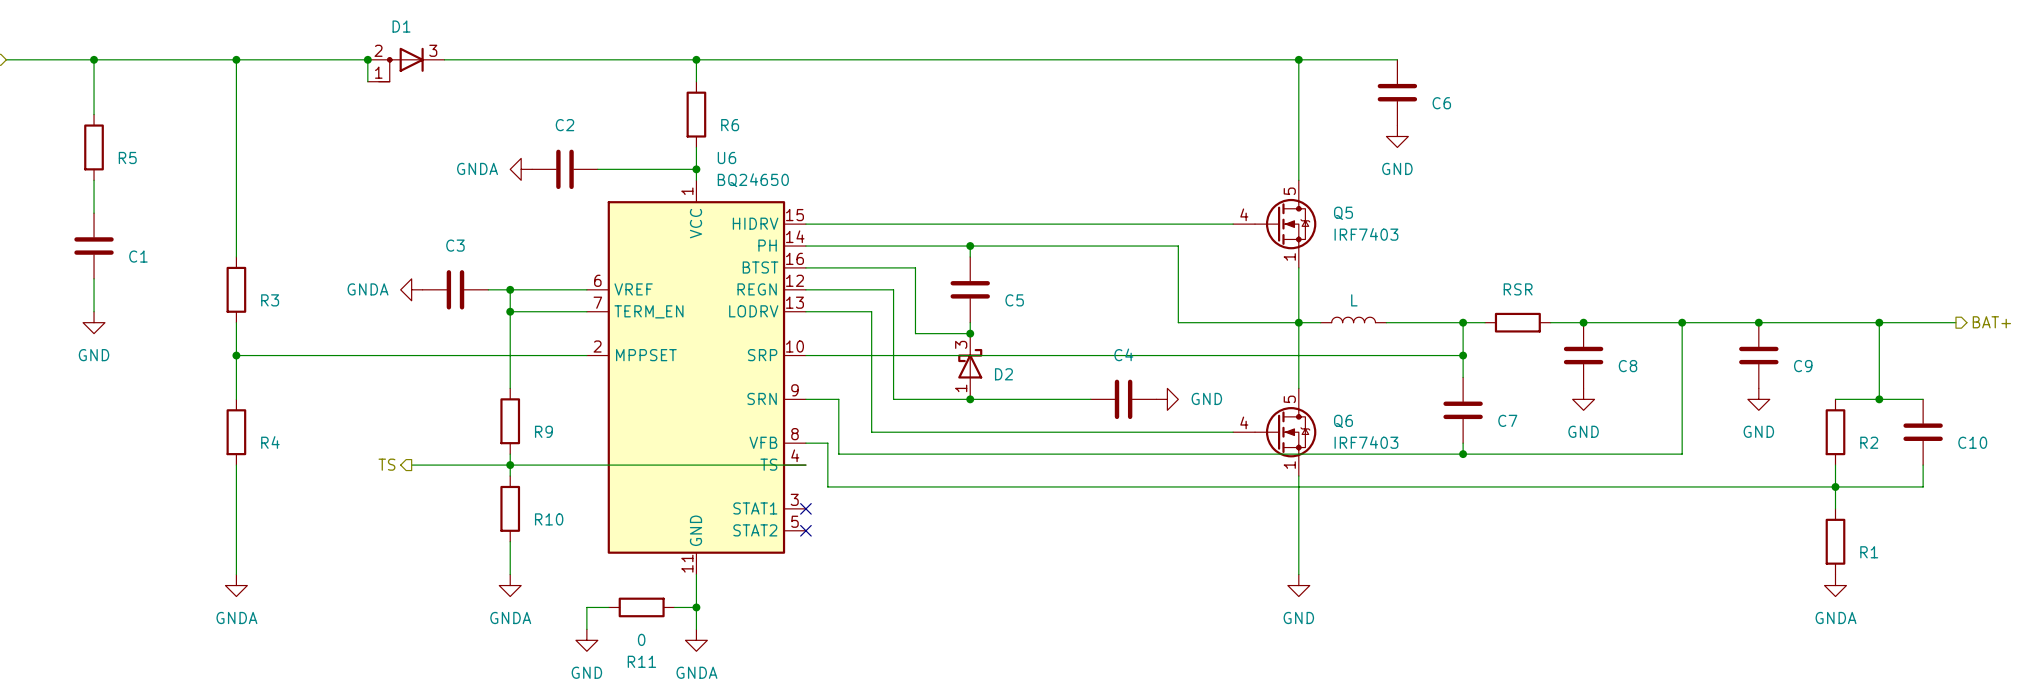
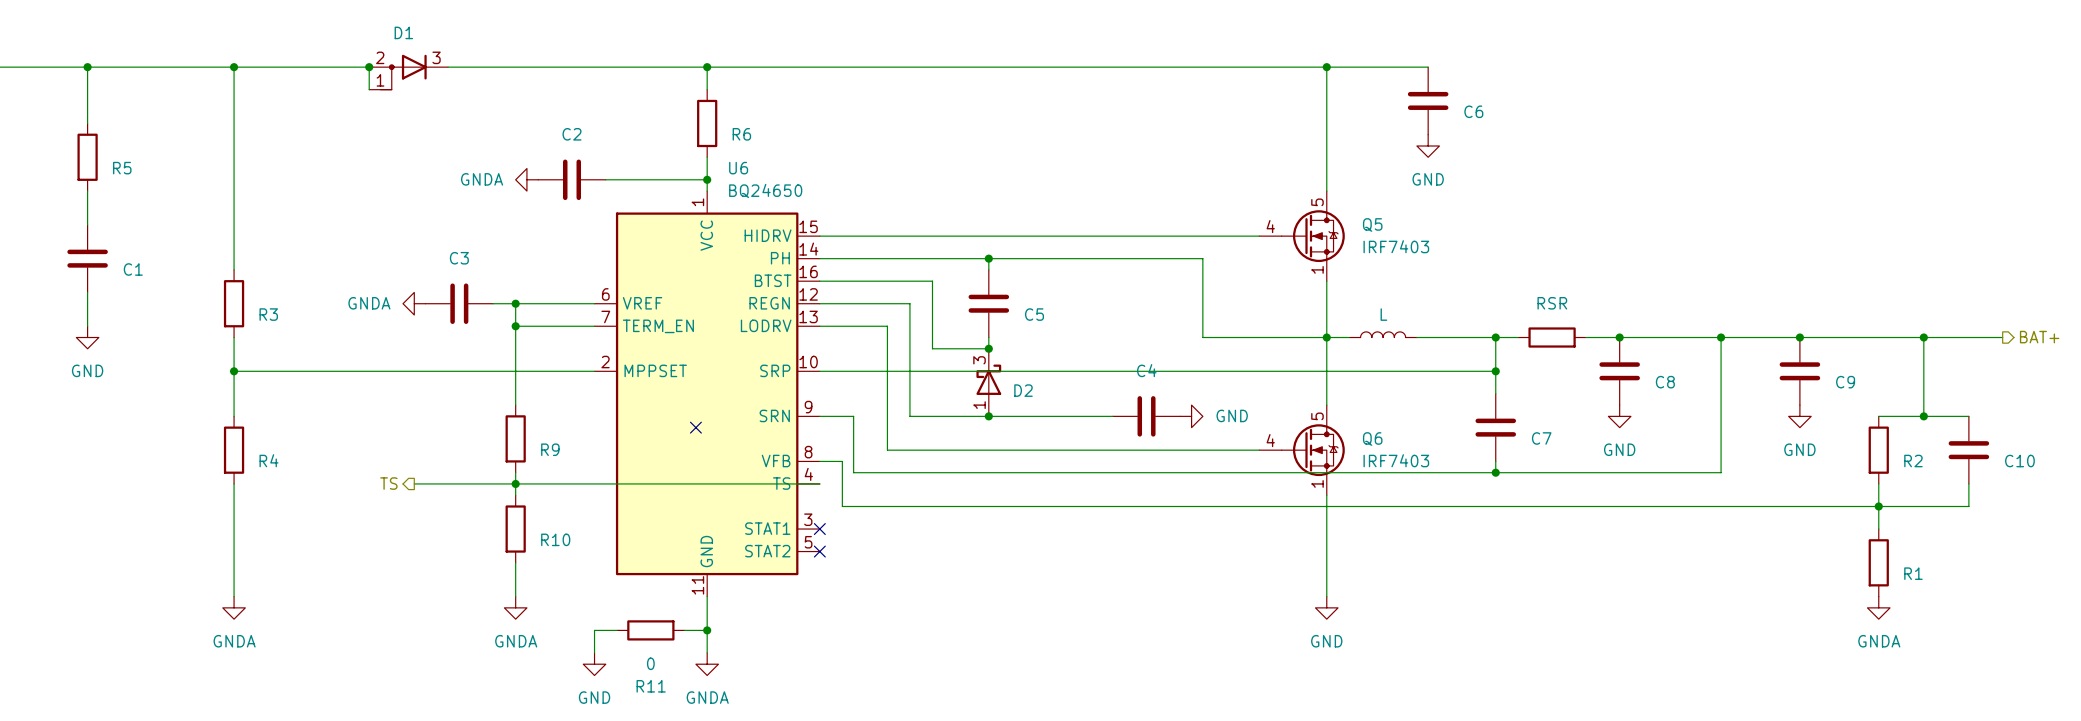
no-connect mark: none -> (695, 427)

